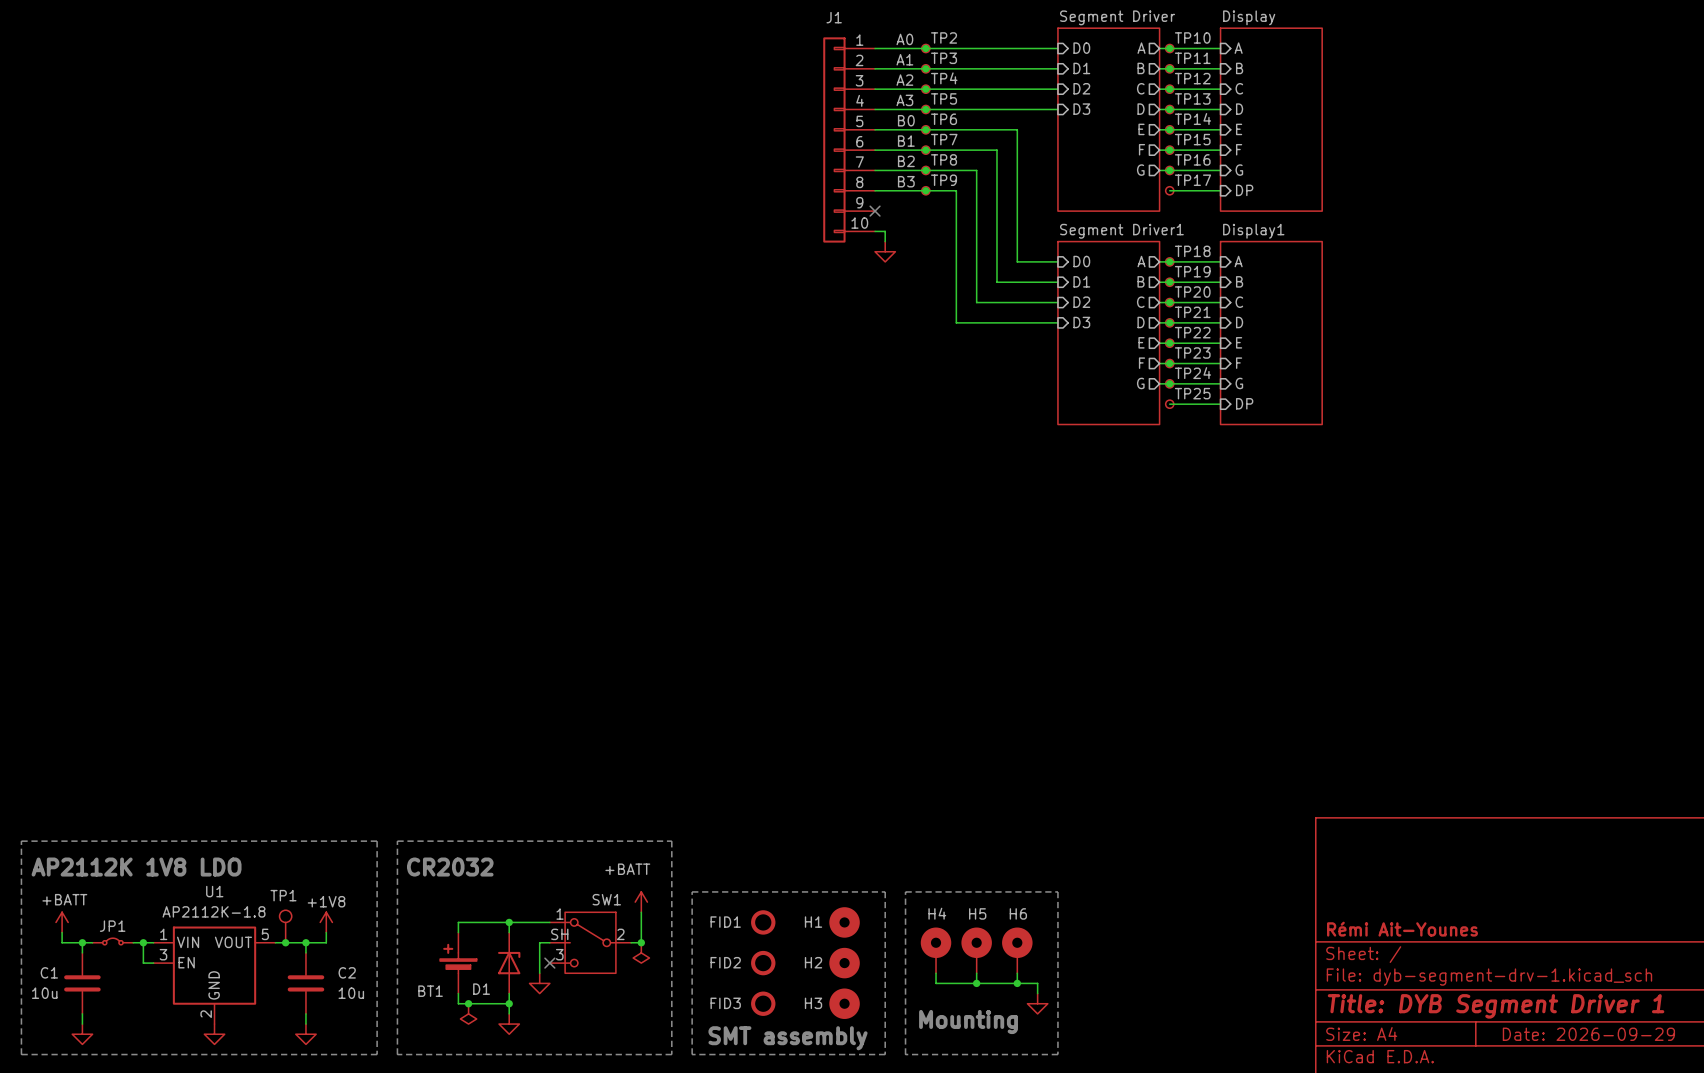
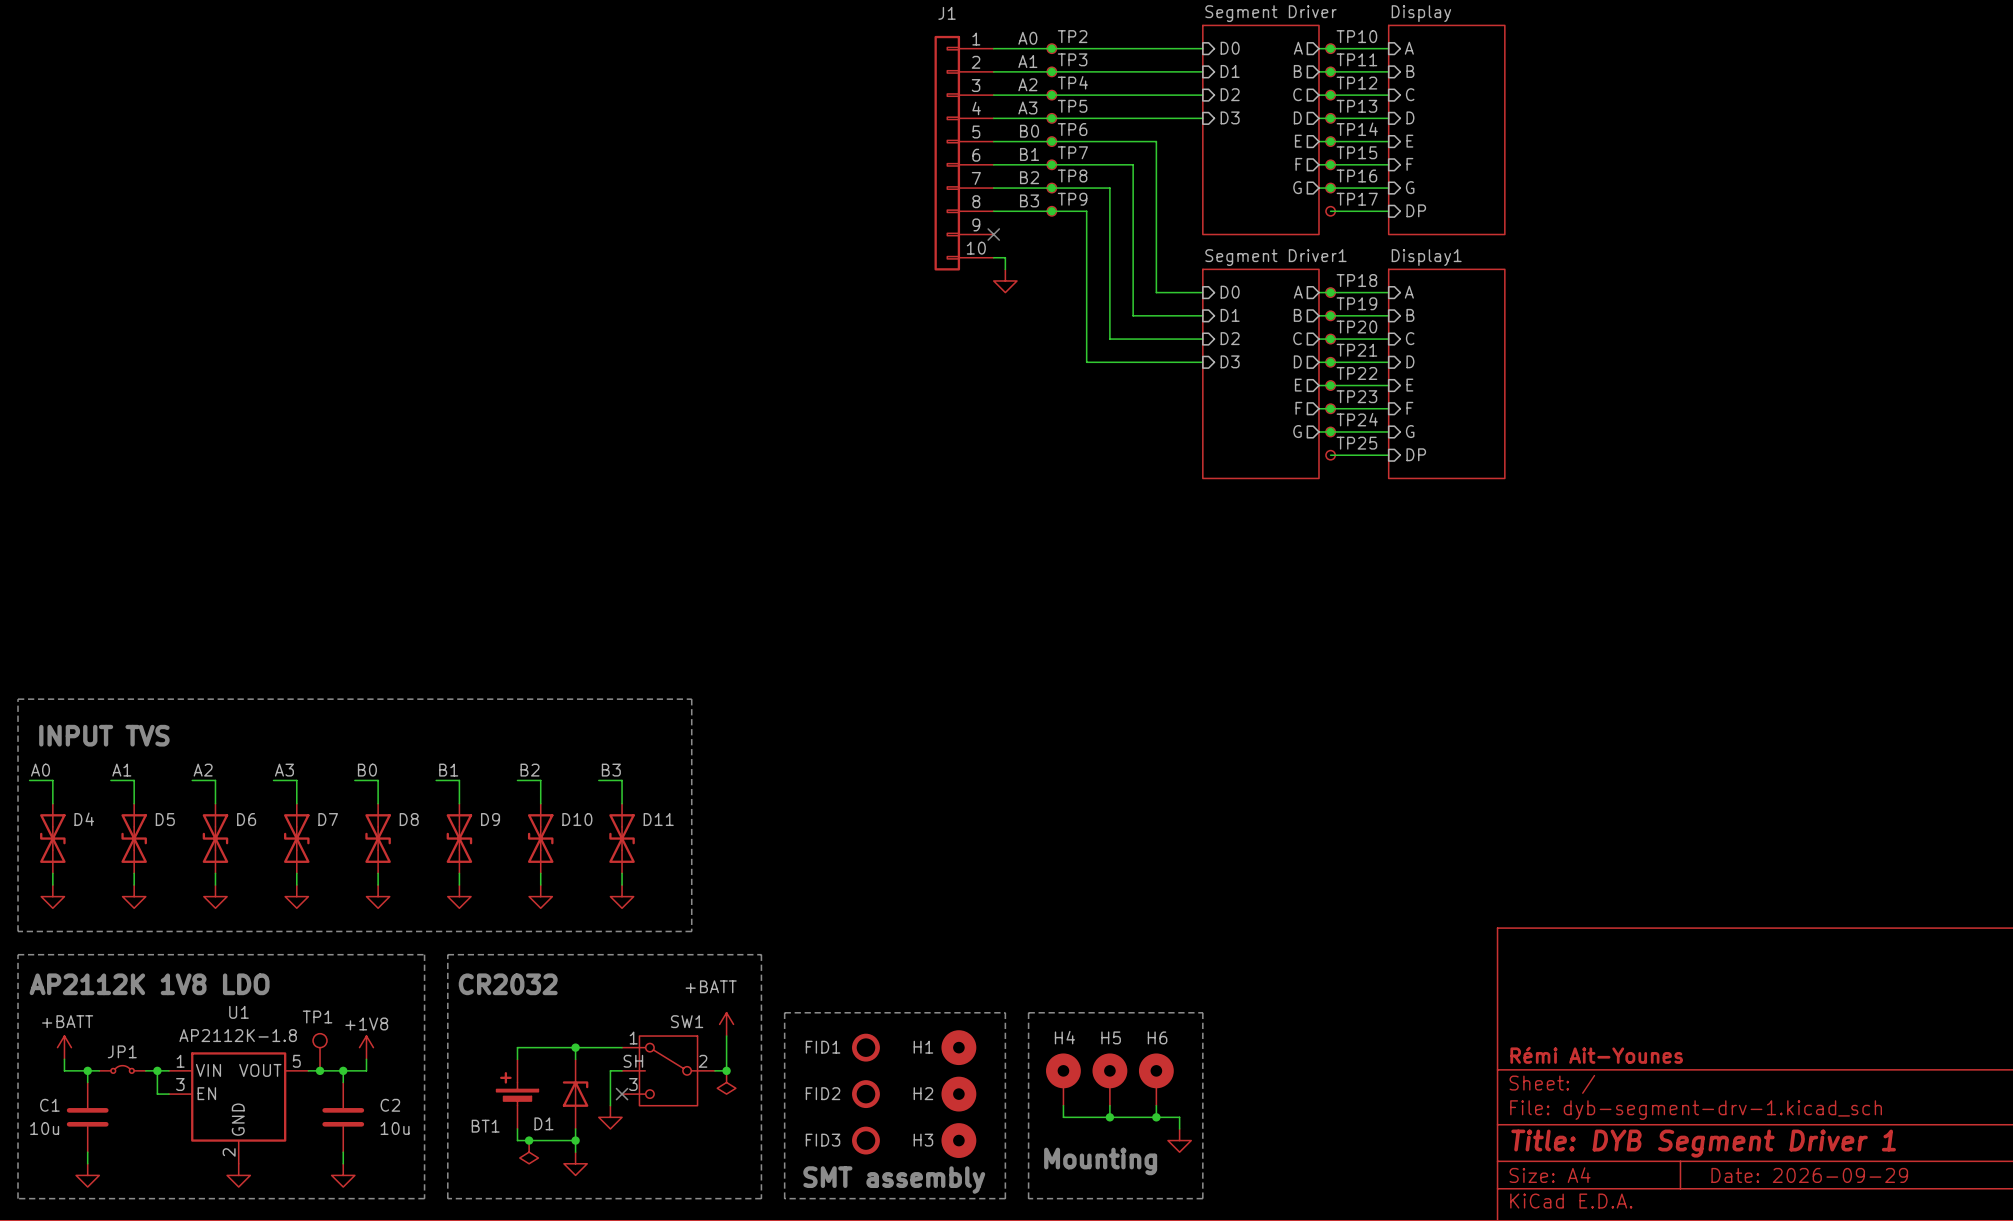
line: none -> (18, 699) (691, 699) (691, 931) (18, 931) (18, 699)
text: none -> INPUT TVS (104, 735)
label: none -> A0 (40, 770)
label: none -> A1 (121, 770)
label: none -> A2 (203, 770)
label: none -> A3 (284, 770)
label: none -> B0 (367, 770)
label: none -> B1 (448, 770)
label: none -> B2 (530, 770)
label: none -> B3 (611, 770)
wire: none -> (29, 780) (52, 780) (52, 803)
wire: none -> (110, 780) (134, 780) (134, 803)
wire: none -> (192, 780) (215, 780) (215, 803)
wire: none -> (273, 780) (296, 780) (296, 803)
wire: none -> (354, 780) (378, 780) (378, 803)
wire: none -> (436, 780) (459, 780) (459, 803)
wire: none -> (517, 780) (540, 780) (540, 803)
wire: none -> (598, 780) (622, 780) (622, 803)
D4: none -> (52, 838)
D5: none -> (134, 838)
D6: none -> (215, 838)
D7: none -> (296, 838)
D8: none -> (378, 838)
D9: none -> (459, 838)
D10: none -> (540, 838)
D11: none -> (622, 838)
wire: none -> (52, 873) (52, 885)
wire: none -> (134, 873) (134, 885)
wire: none -> (215, 873) (215, 885)
wire: none -> (296, 873) (296, 885)
wire: none -> (378, 873) (378, 885)
wire: none -> (459, 873) (459, 885)
wire: none -> (540, 873) (540, 885)
wire: none -> (622, 873) (622, 885)
power symbol: none -> (52, 896)
power symbol: none -> (134, 896)
power symbol: none -> (215, 896)
power symbol: none -> (296, 896)
power symbol: none -> (378, 896)
power symbol: none -> (459, 896)
power symbol: none -> (540, 896)
power symbol: none -> (622, 896)

